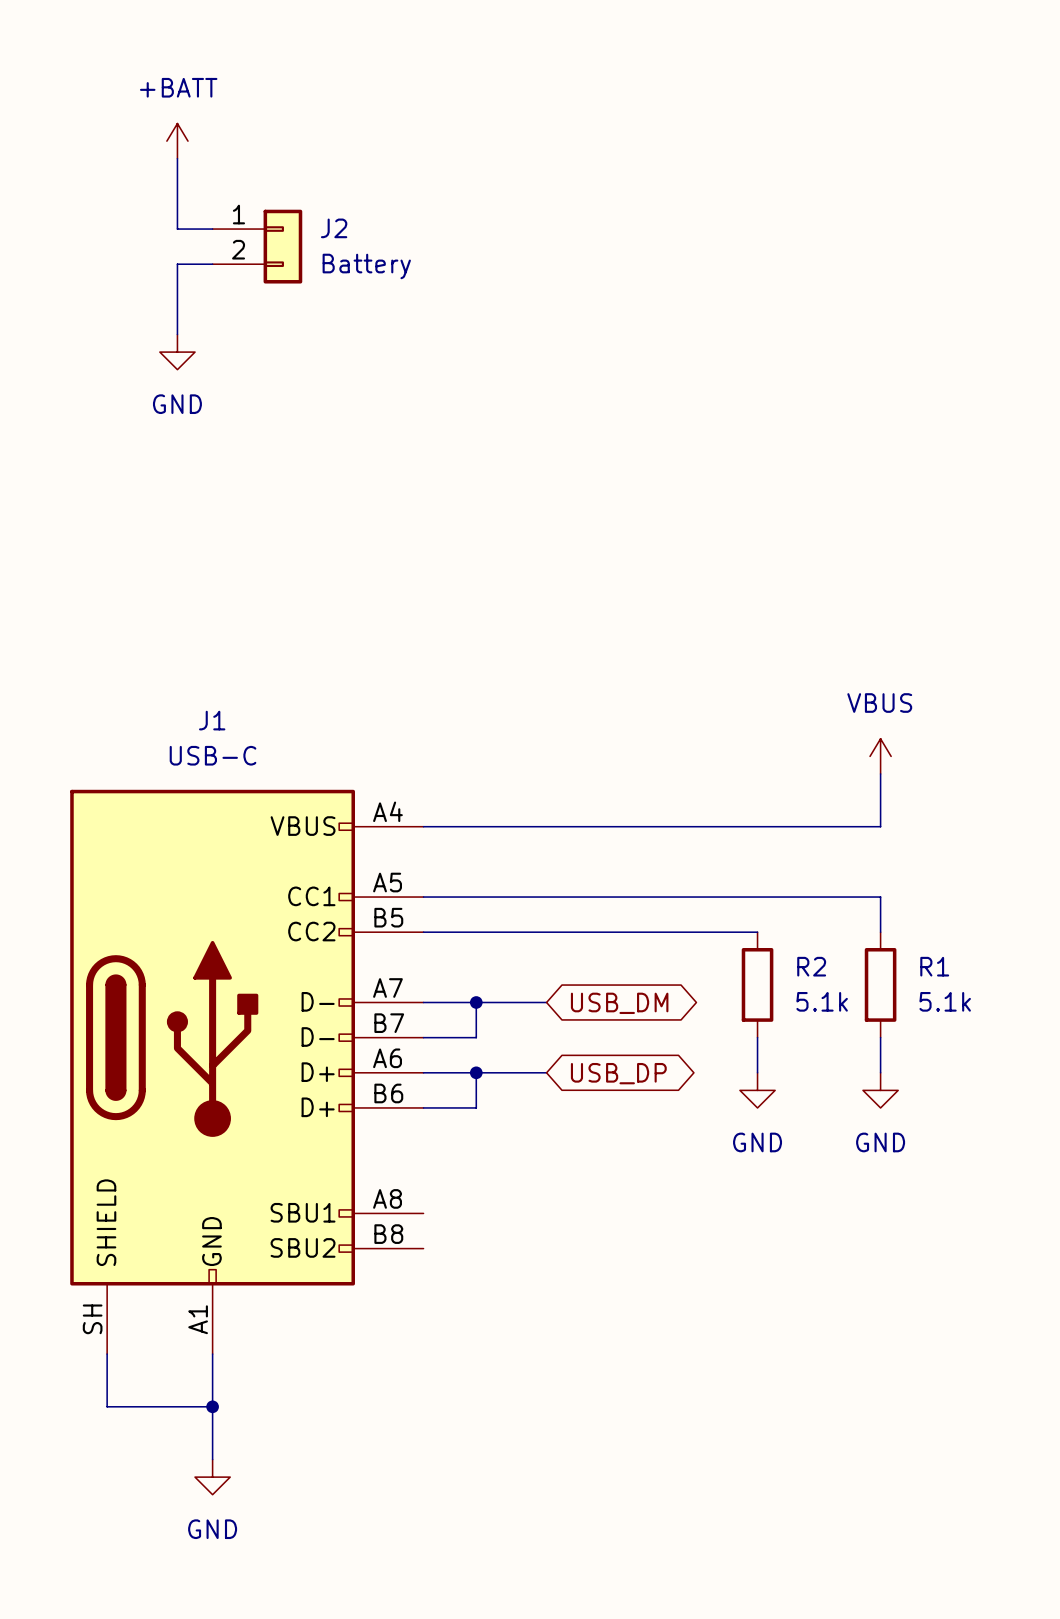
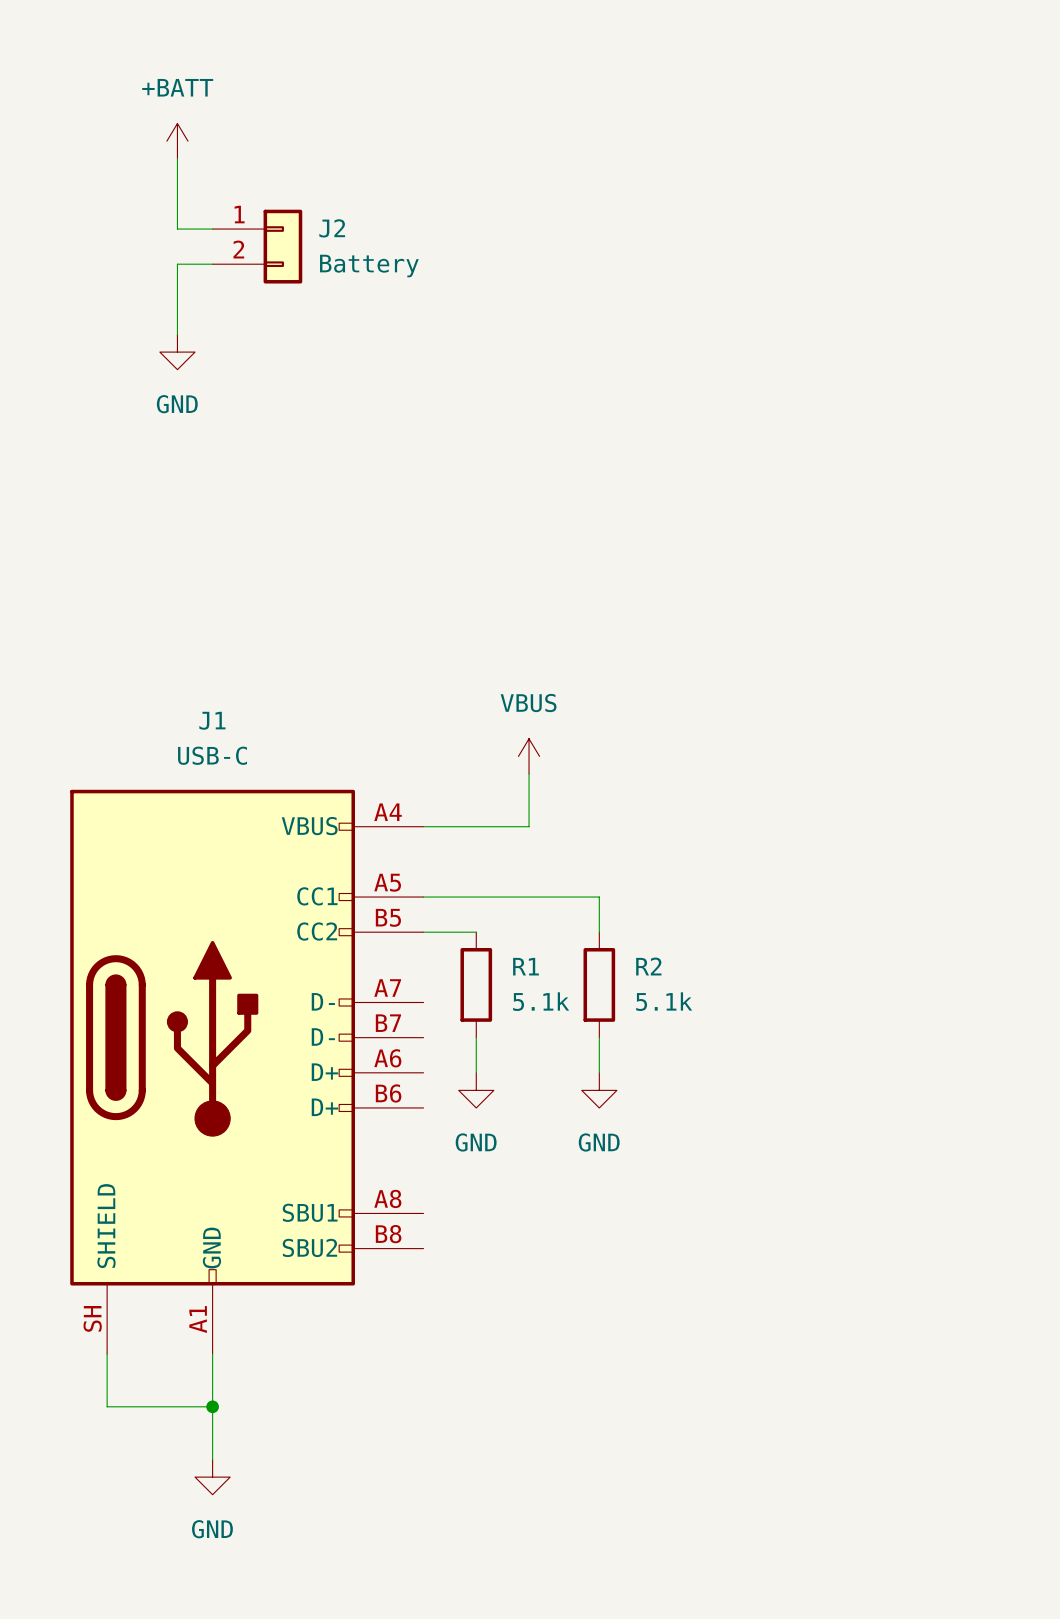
power symbol: none -> VBUS (529, 756)
power symbol: VBUS (880, 756) -> none
wire: (880, 773) (880, 826) (529, 826) -> (529, 773) (529, 826)
wire: (599, 897) (880, 897) (880, 932) -> (599, 897) (599, 932)
wire: (476, 932) (757, 932) -> none
R2 position: (757, 984) -> (599, 984)
R1 position: (880, 984) -> (476, 984)
wire: (423, 1002) (546, 1002) -> none
wire: (476, 1002) (476, 1037) (423, 1037) -> none
junction: (476, 1002) -> none
global label: USB_DM (619, 1003) -> none
wire: (757, 1037) (757, 1072) -> none
wire: (880, 1037) (880, 1072) -> (599, 1037) (599, 1072)
wire: (423, 1072) (546, 1072) -> none
wire: (476, 1072) (476, 1107) (423, 1107) -> (476, 1072) (476, 1037)
junction: (476, 1072) -> none
global label: USB_DP (618, 1073) -> none
power symbol: none -> GND (476, 1090)
power symbol: none -> GND (599, 1090)
power symbol: GND (757, 1090) -> none
power symbol: GND (880, 1090) -> none

